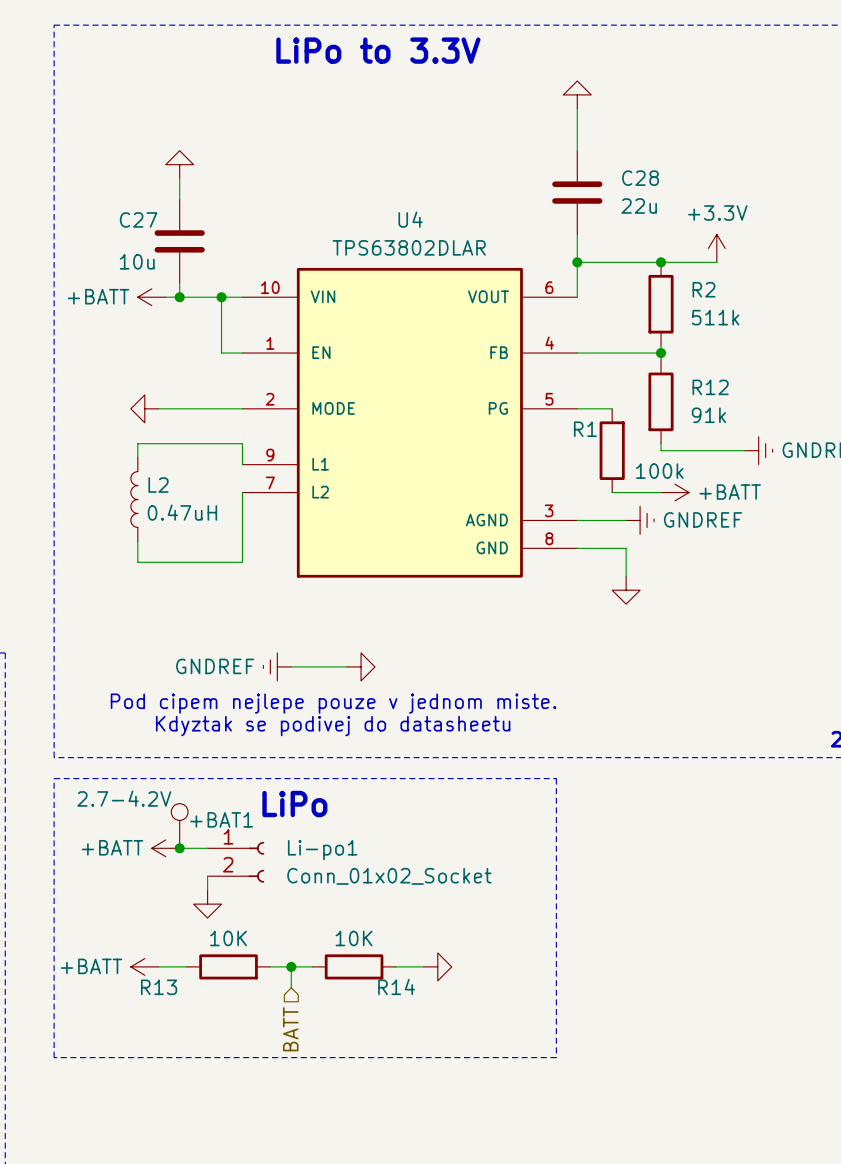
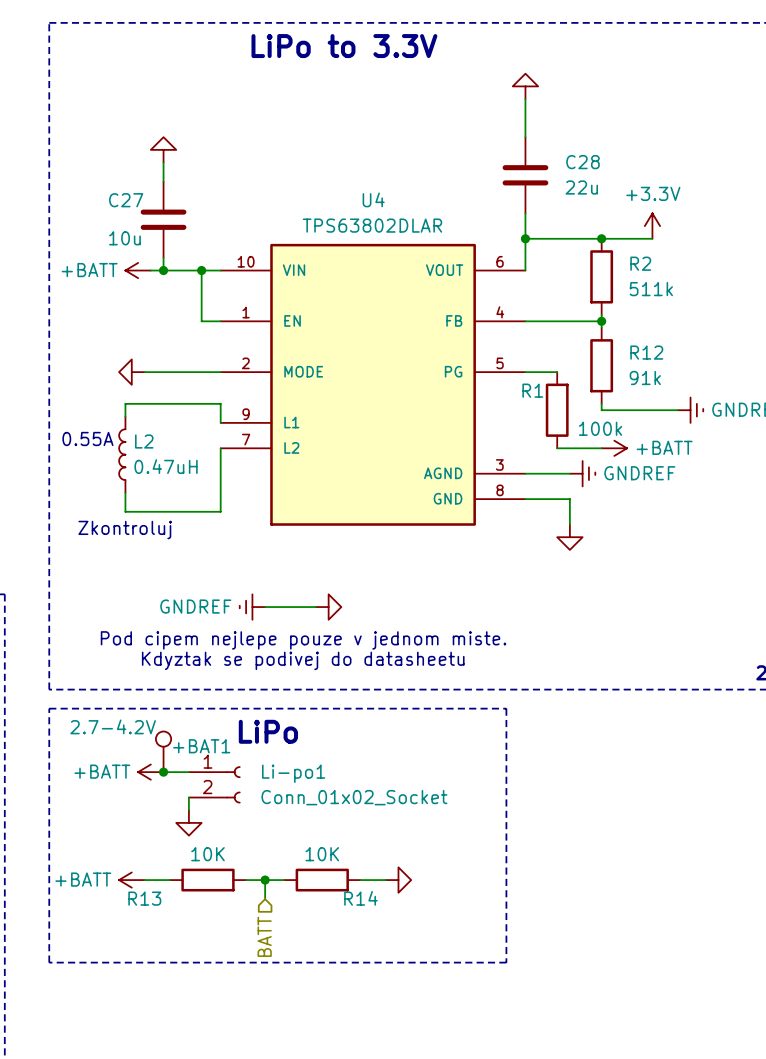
text: none -> 0.55A (87, 438)
text: none -> Zkontroluj (125, 529)

